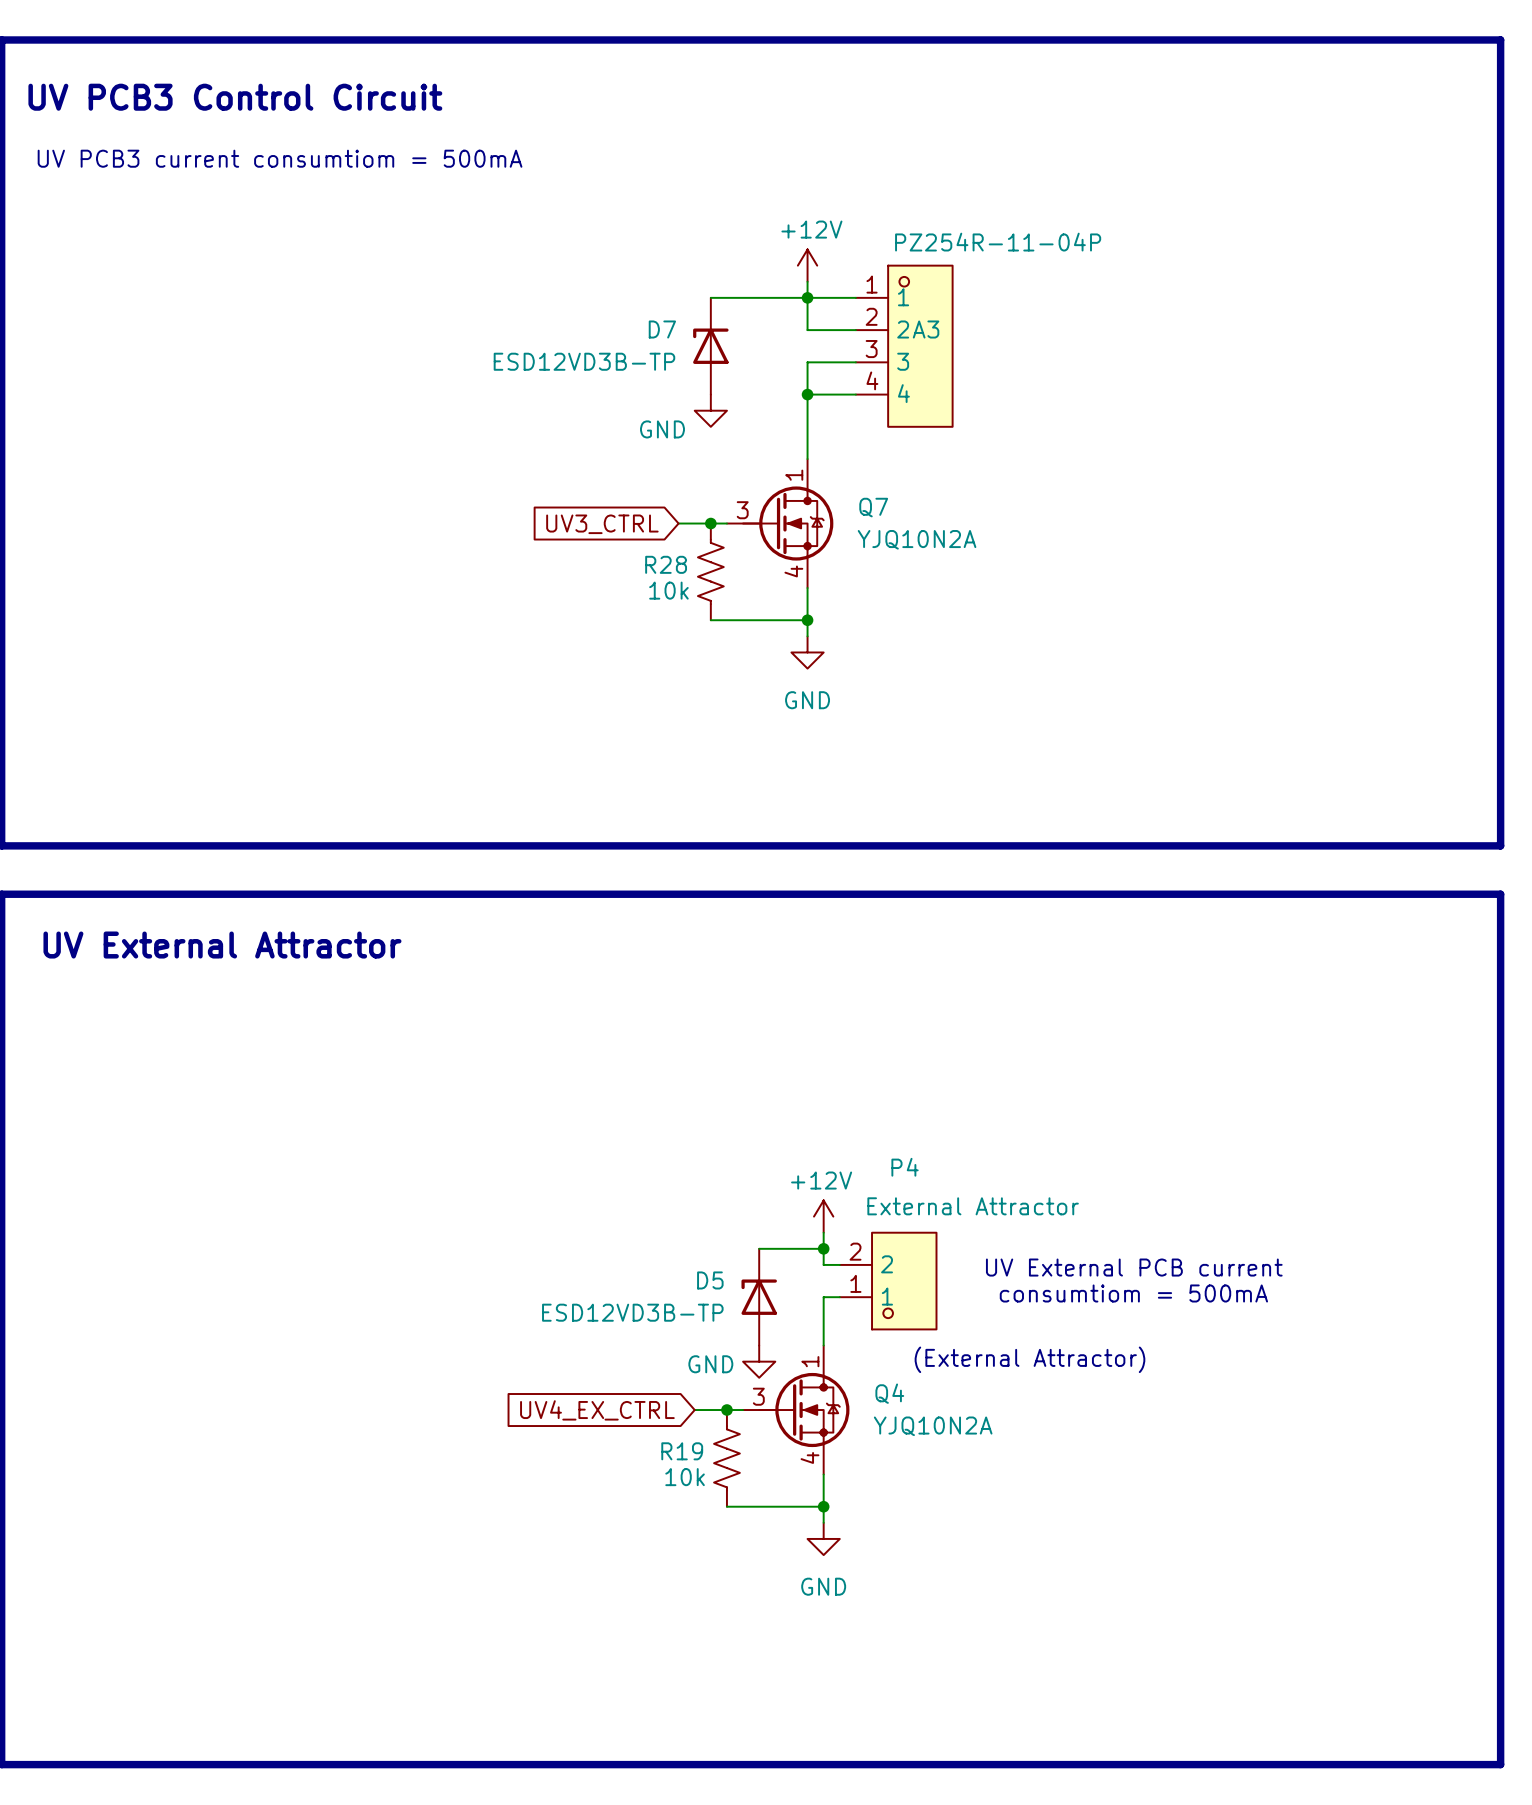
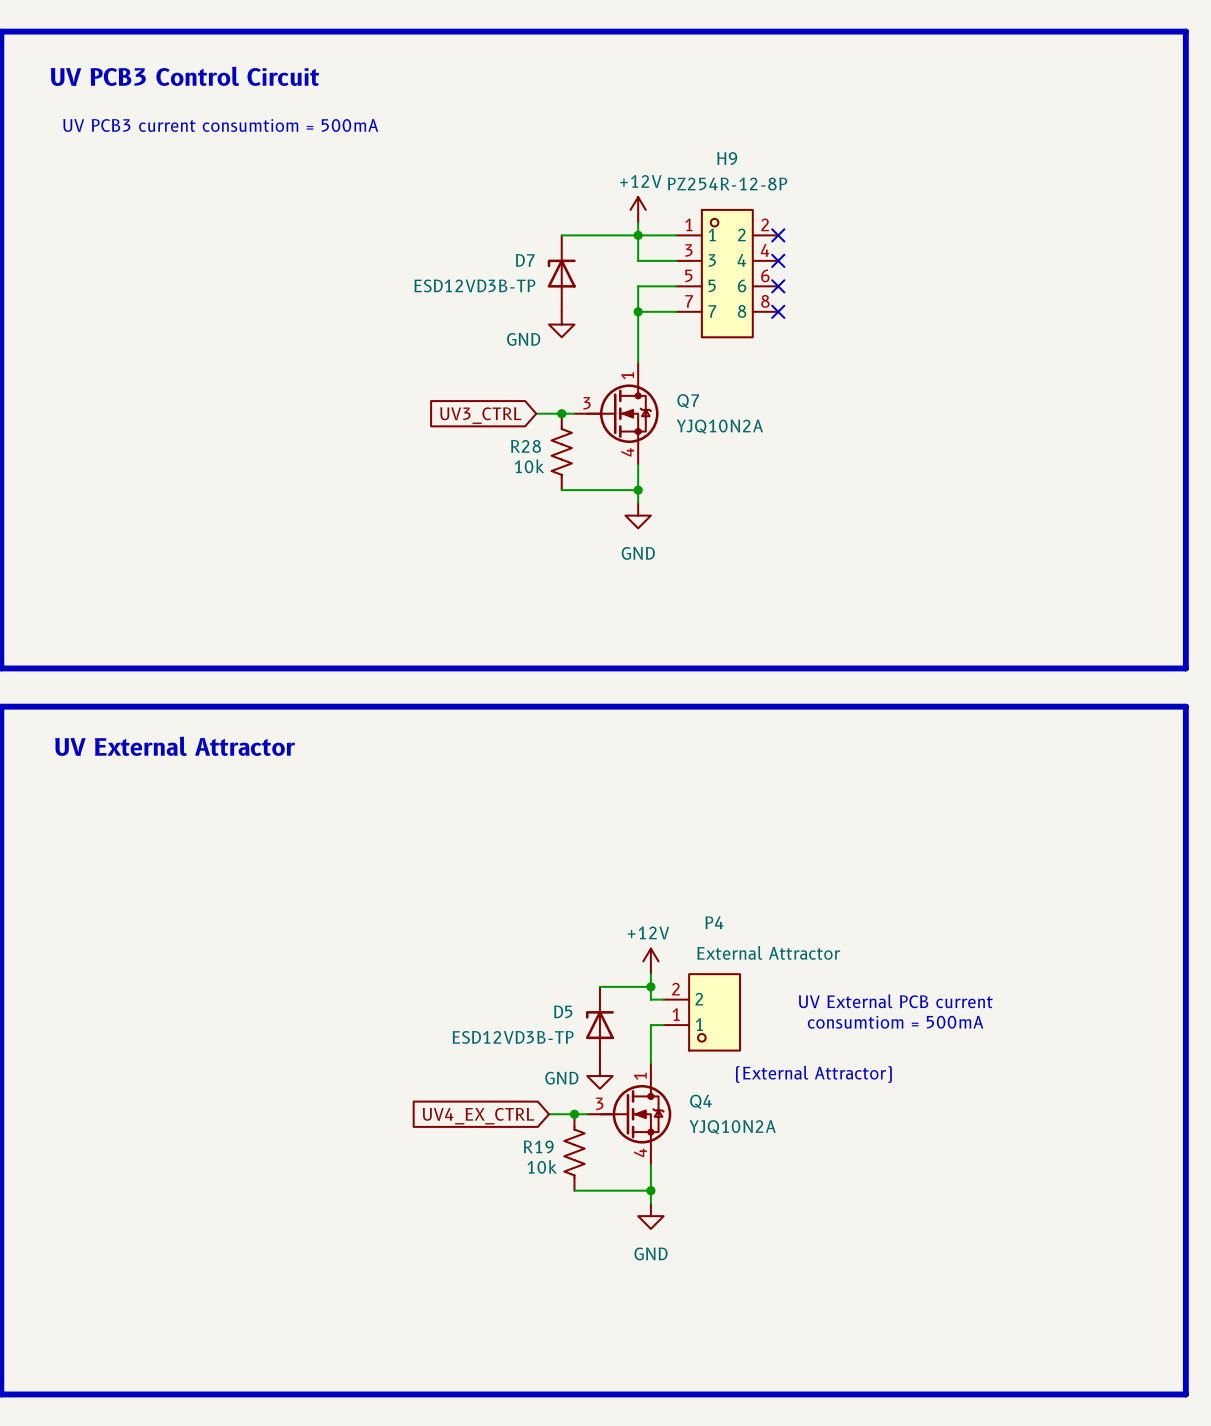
no-connect mark: none -> (778, 235)
no-connect mark: none -> (778, 260)
A3: PZ254R-11-04P (904, 346) -> none
H9: none -> PZ254R-12-8P (727, 273)
no-connect mark: none -> (778, 286)
no-connect mark: none -> (778, 311)

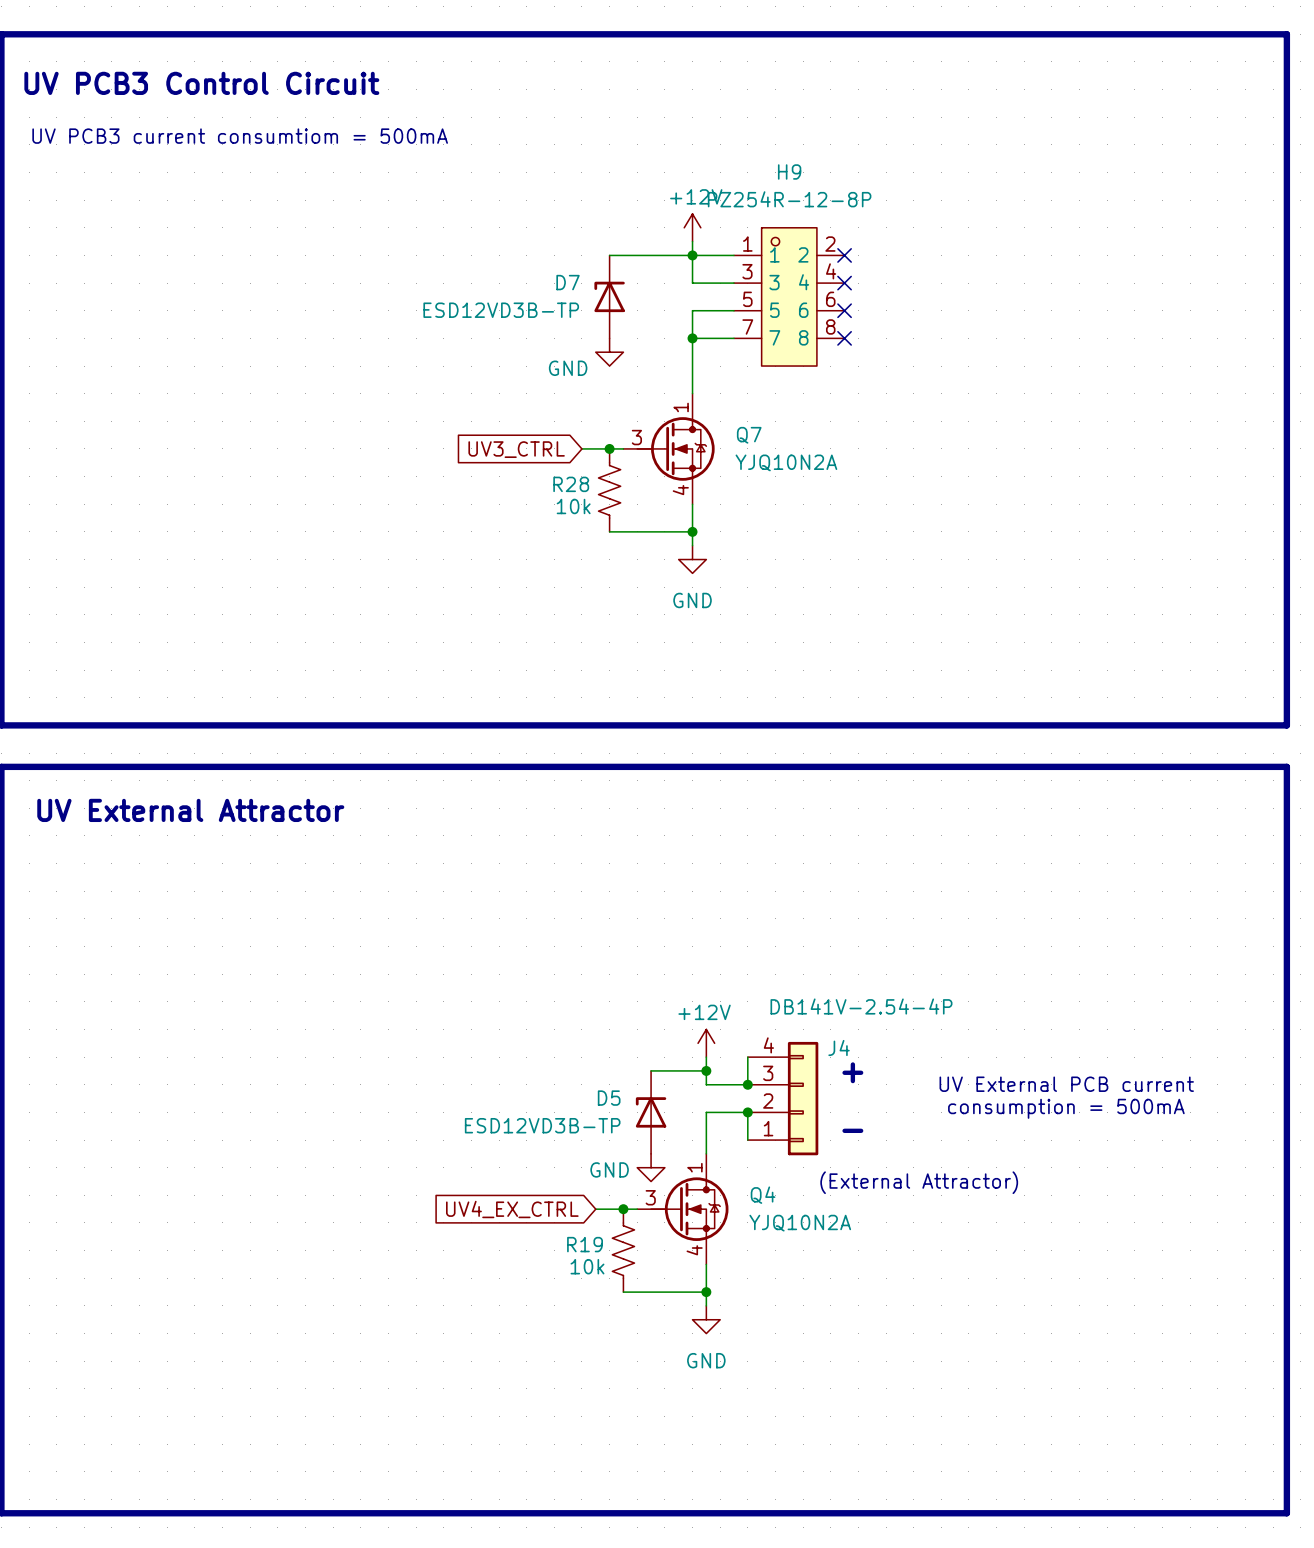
text: none -> + (852, 1072)
junction: none -> (747, 1084)
text position: UV External PCB current (895, 1001) -> UV External PCB current (1066, 1084)
P4: External Attractor (701, 1012) -> none
J4: none -> DB141V-2.54-4P (783, 1098)
text: consumtiom = 500mA (895, 1022) -> consumption = 500mA (1066, 1108)
junction: none -> (747, 1112)
text: none -> - (852, 1130)
text position: (External Attractor) (813, 1074) -> (External Attractor) (919, 1182)

